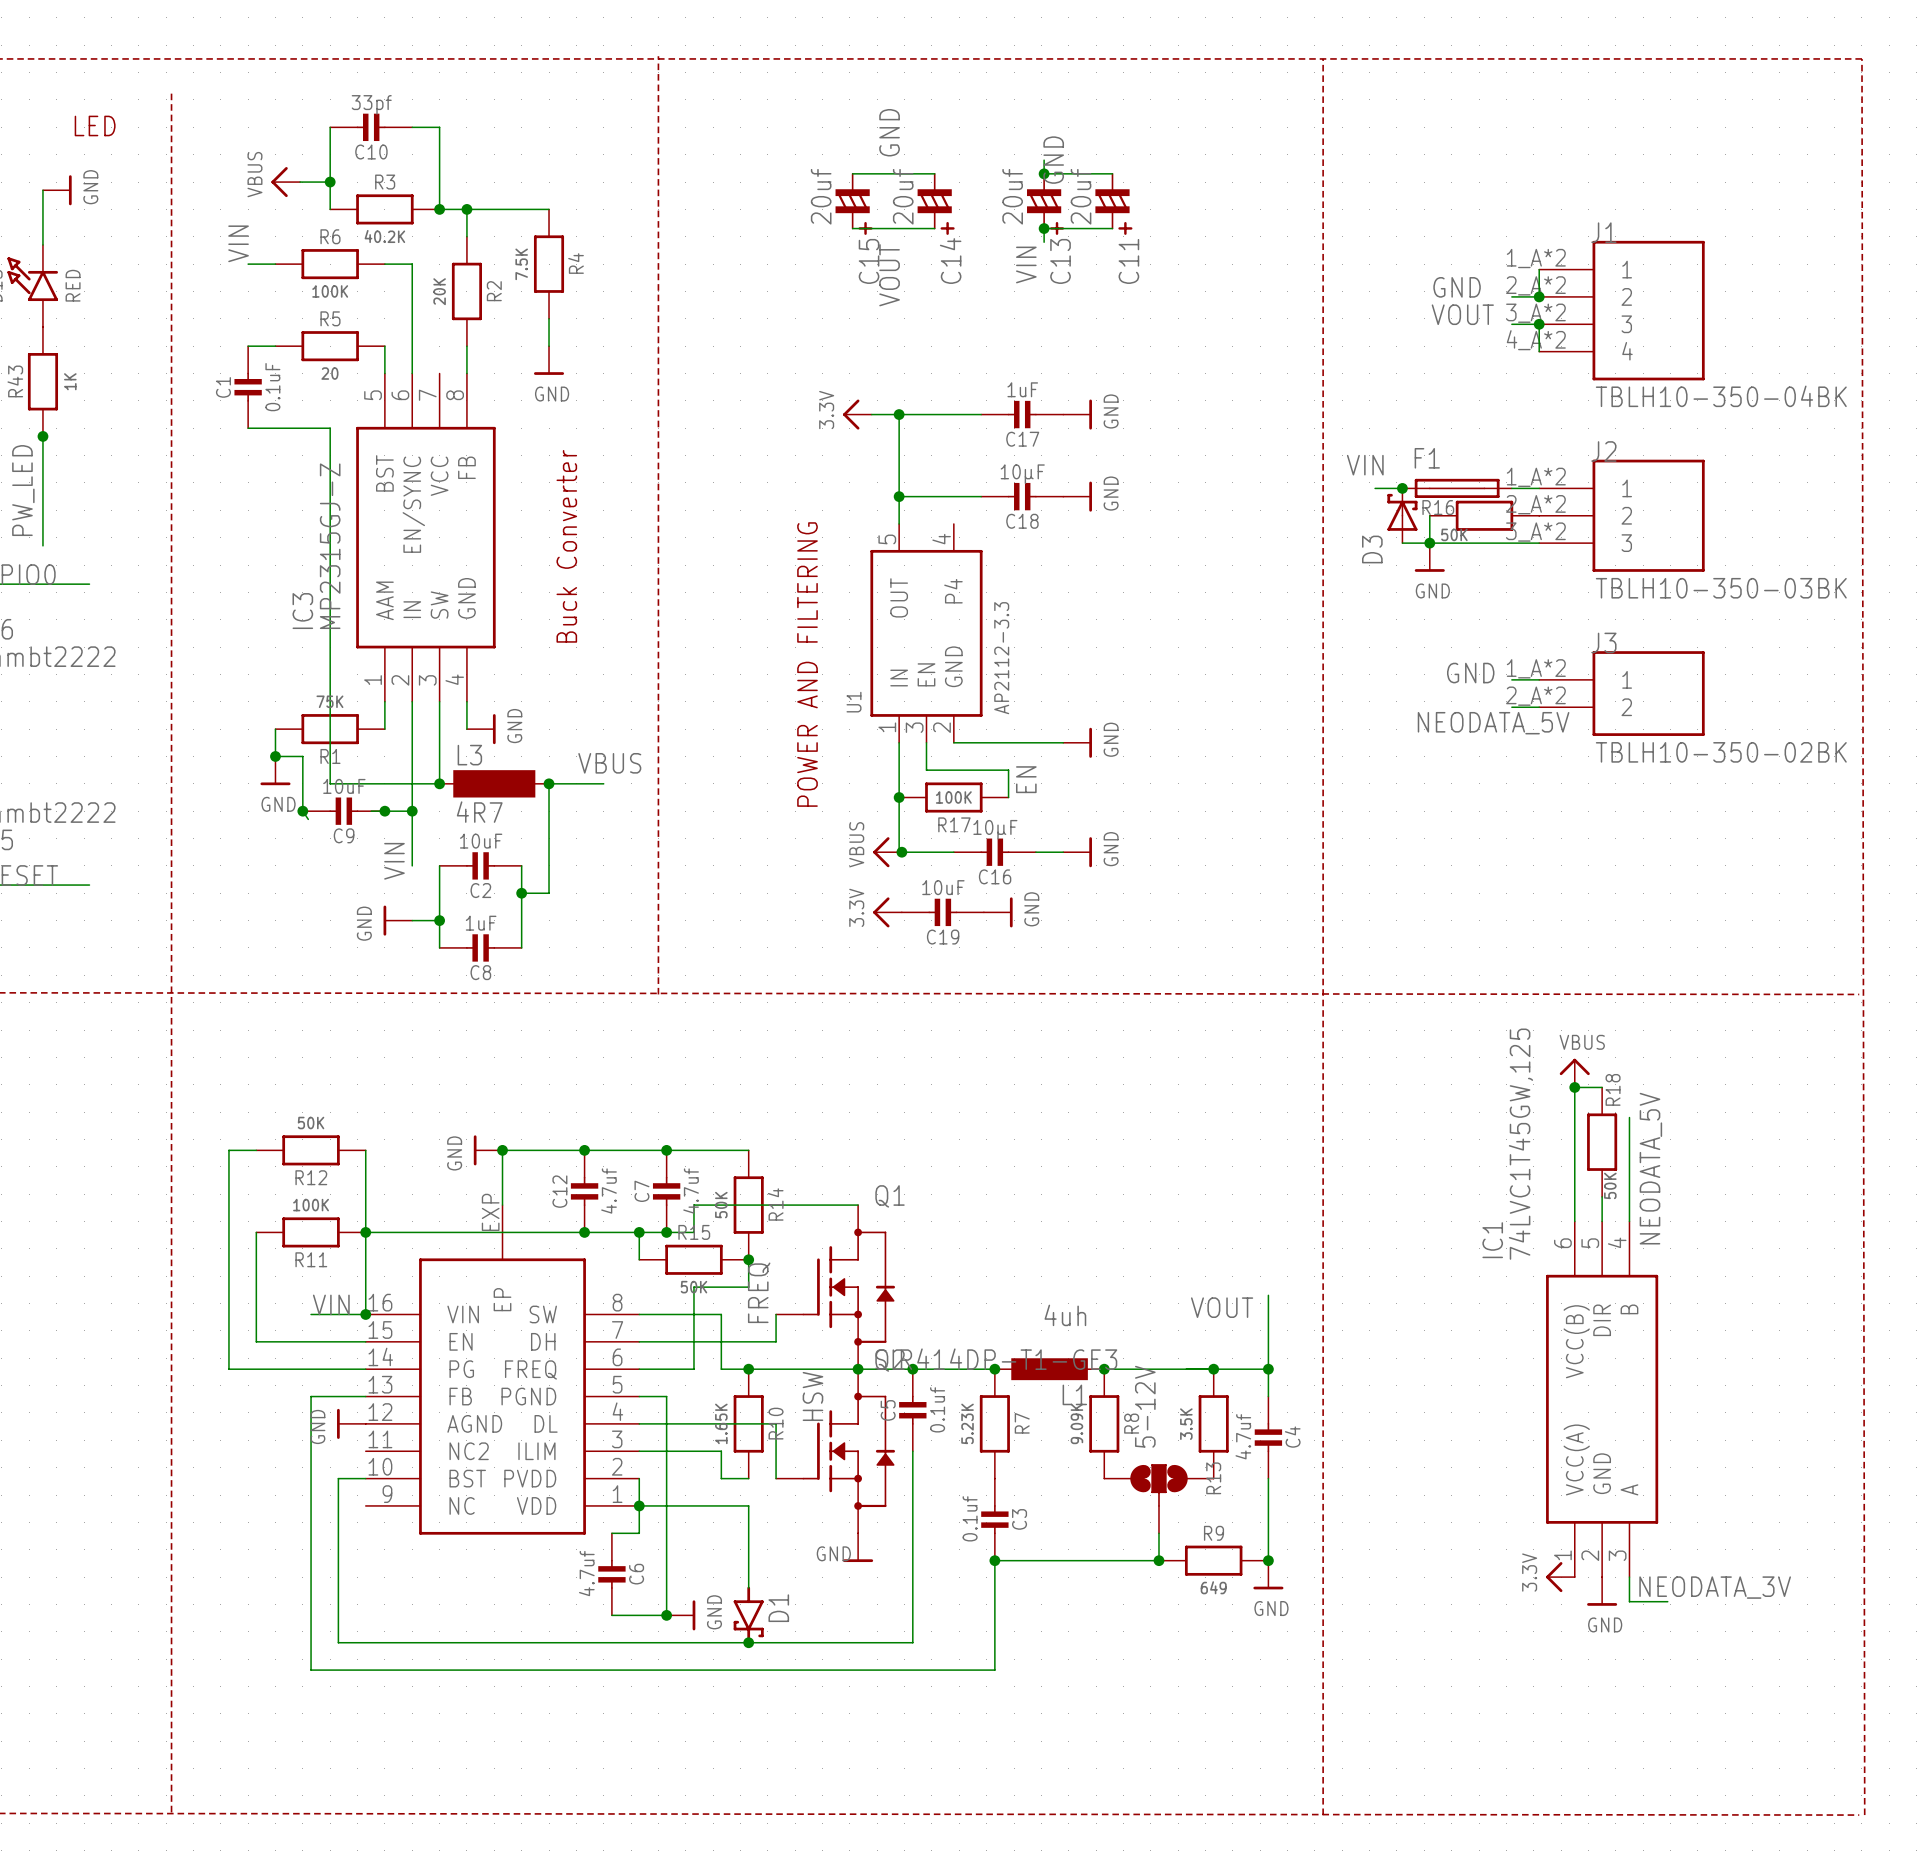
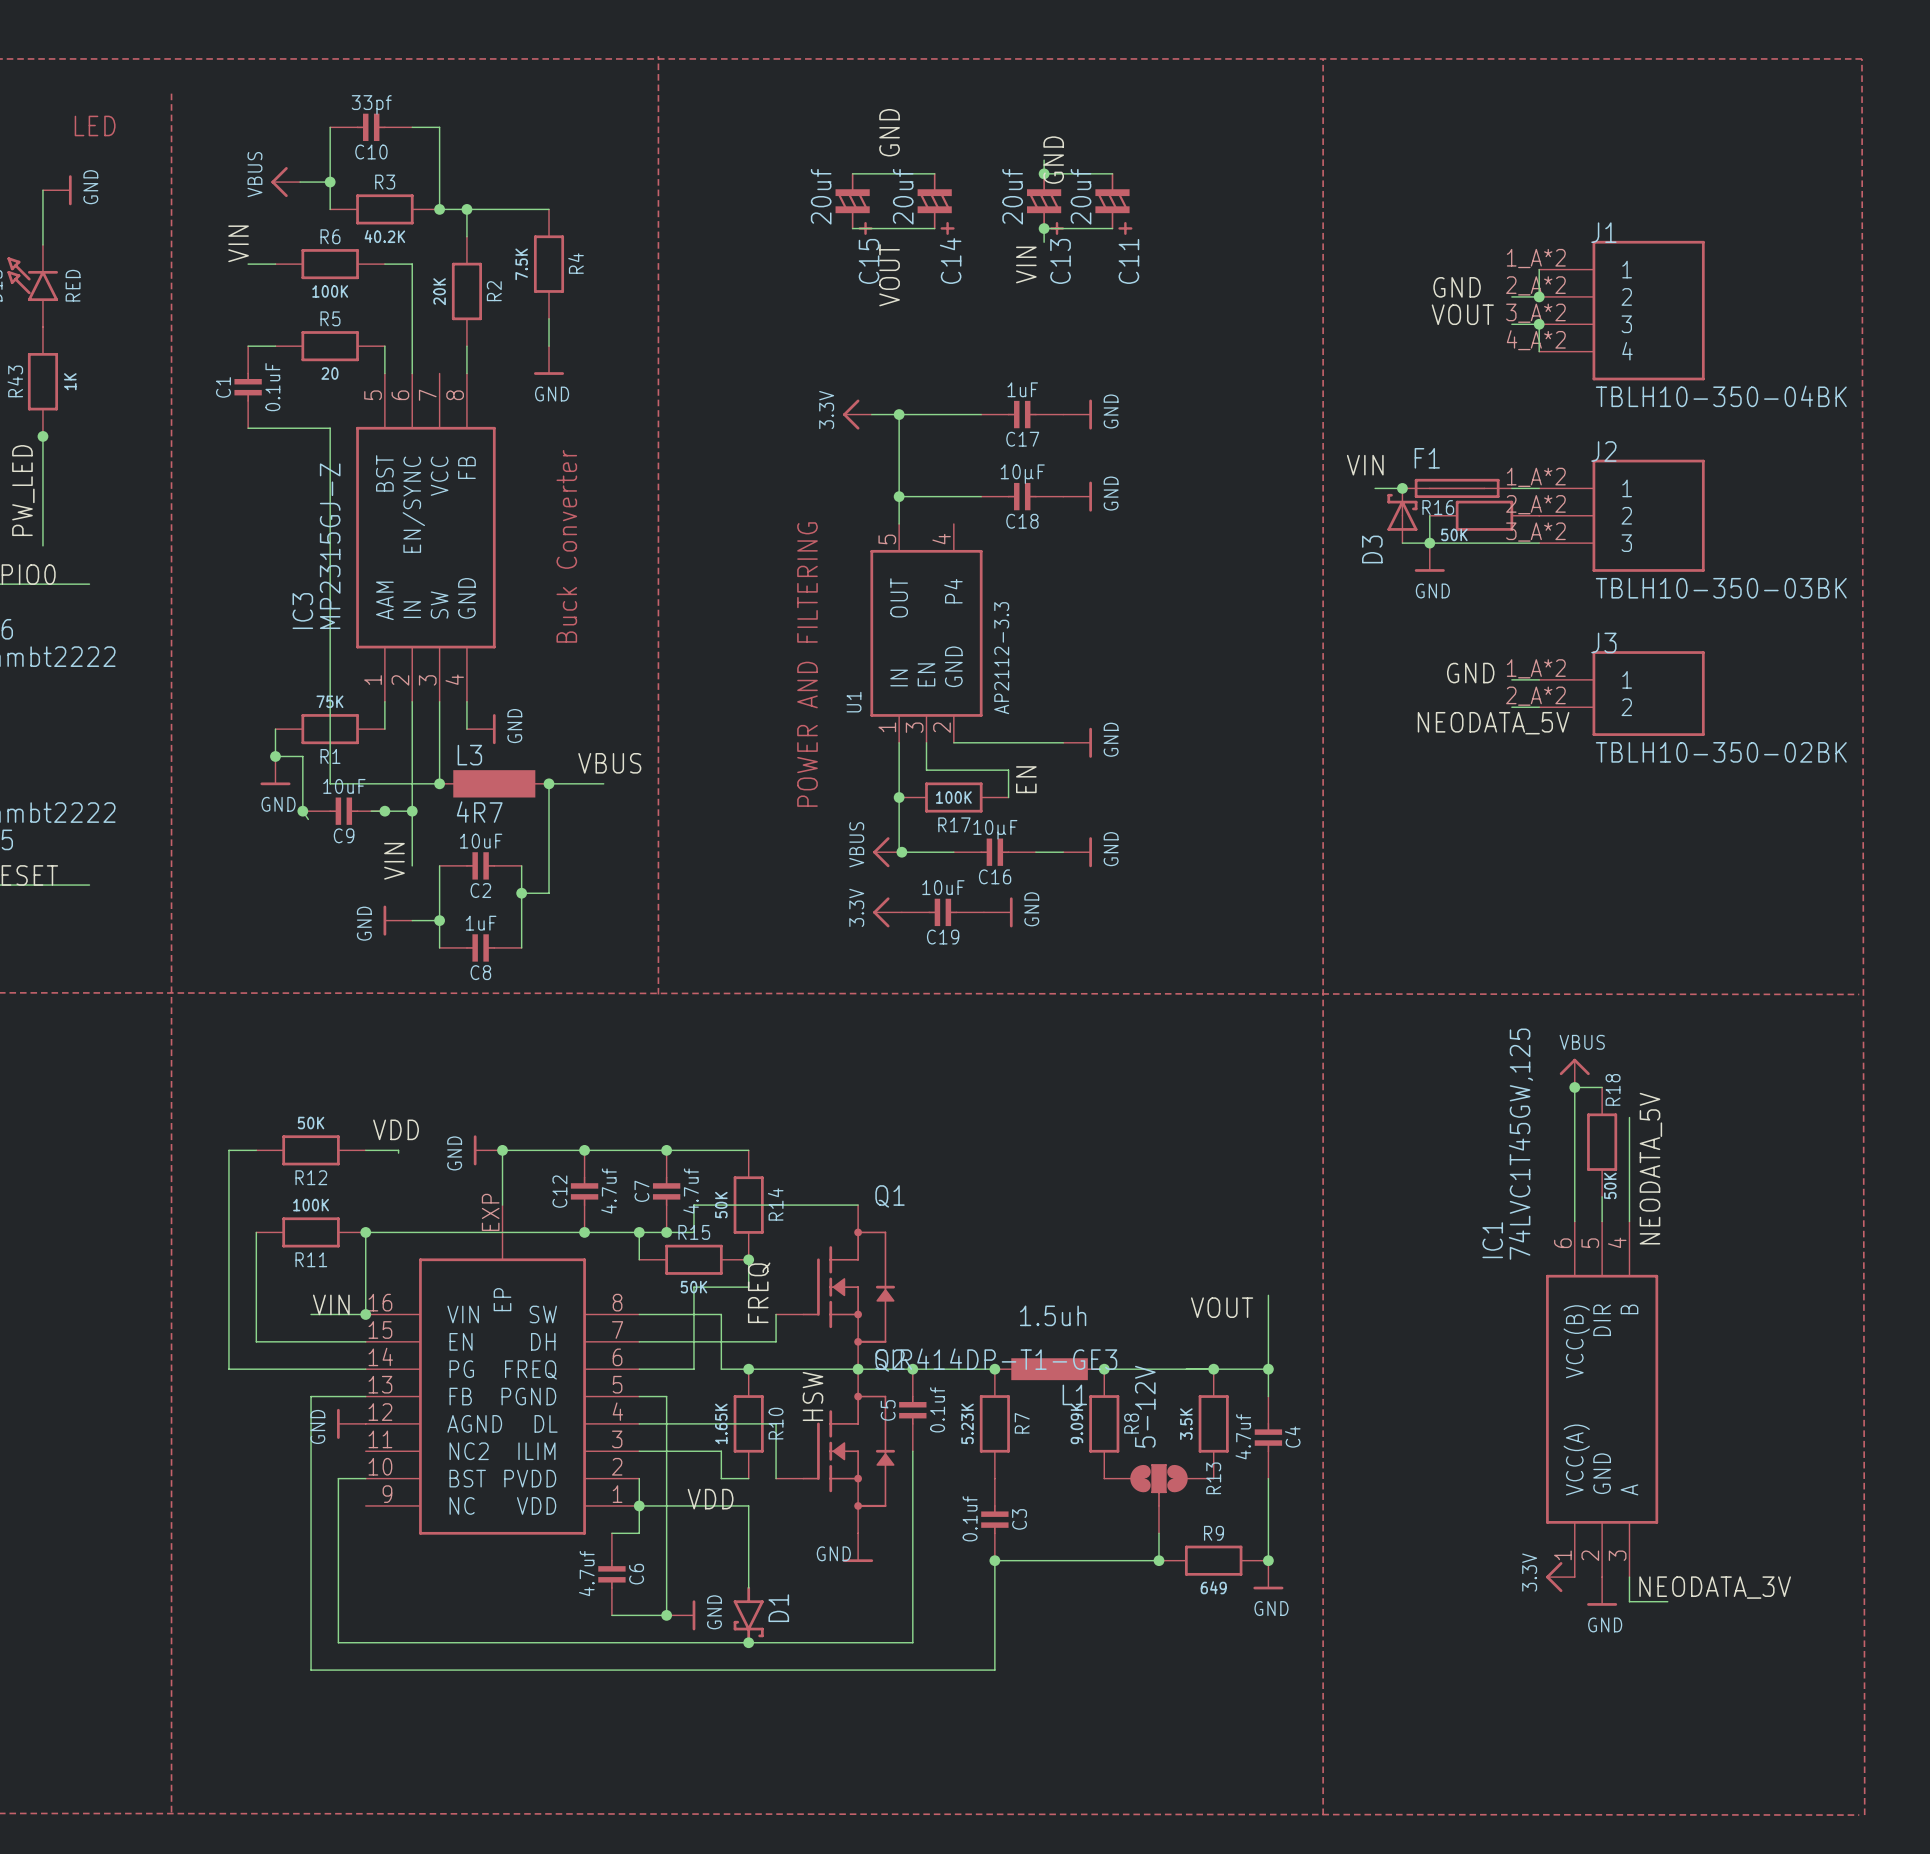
label: none -> VDD (396, 1129)
wire: (365, 1150) (365, 1232) -> (365, 1150) (398, 1150) (398, 1153)
L1 value: 4uh (1065, 1315) -> 1.5uh (1053, 1315)
label: none -> VDD (710, 1499)

